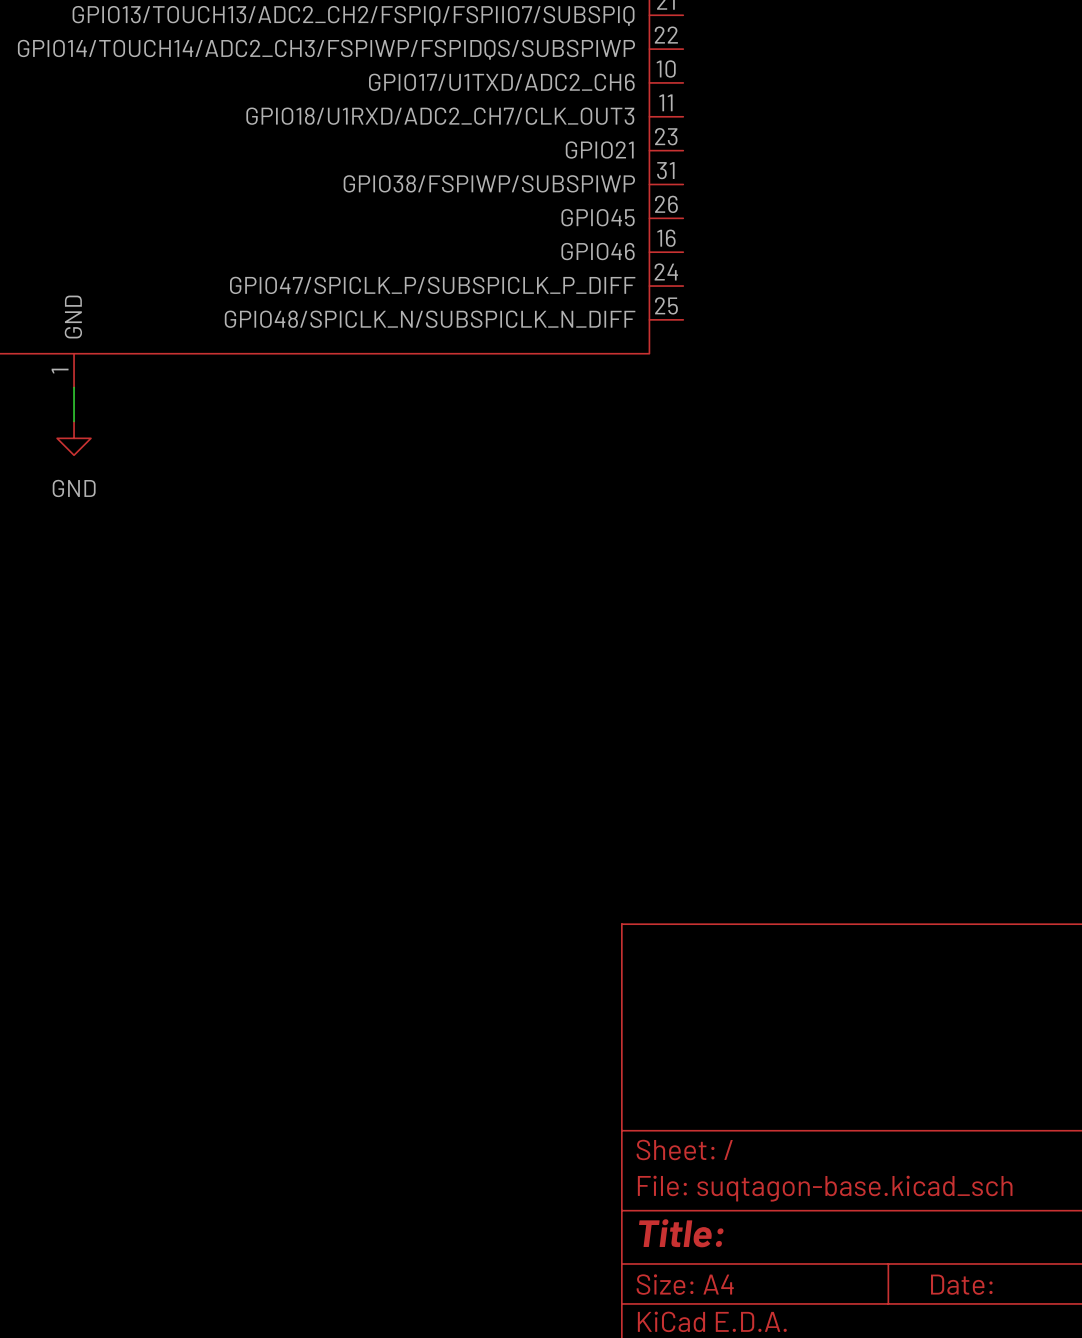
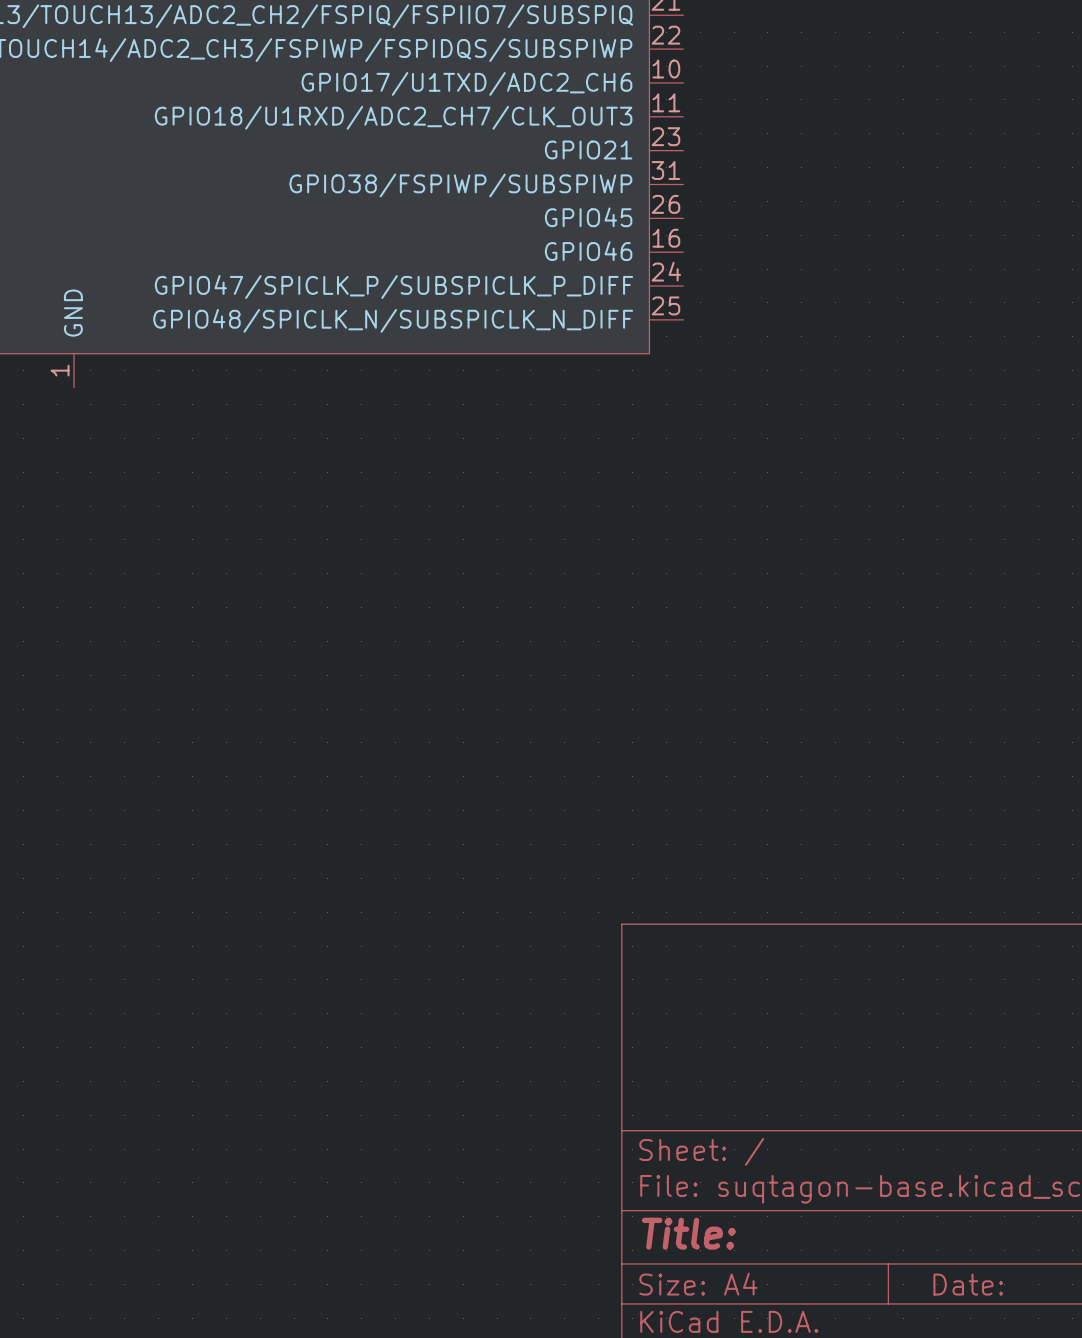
wire: (74, 387) (74, 421) -> none
power symbol: GND (74, 438) -> none

